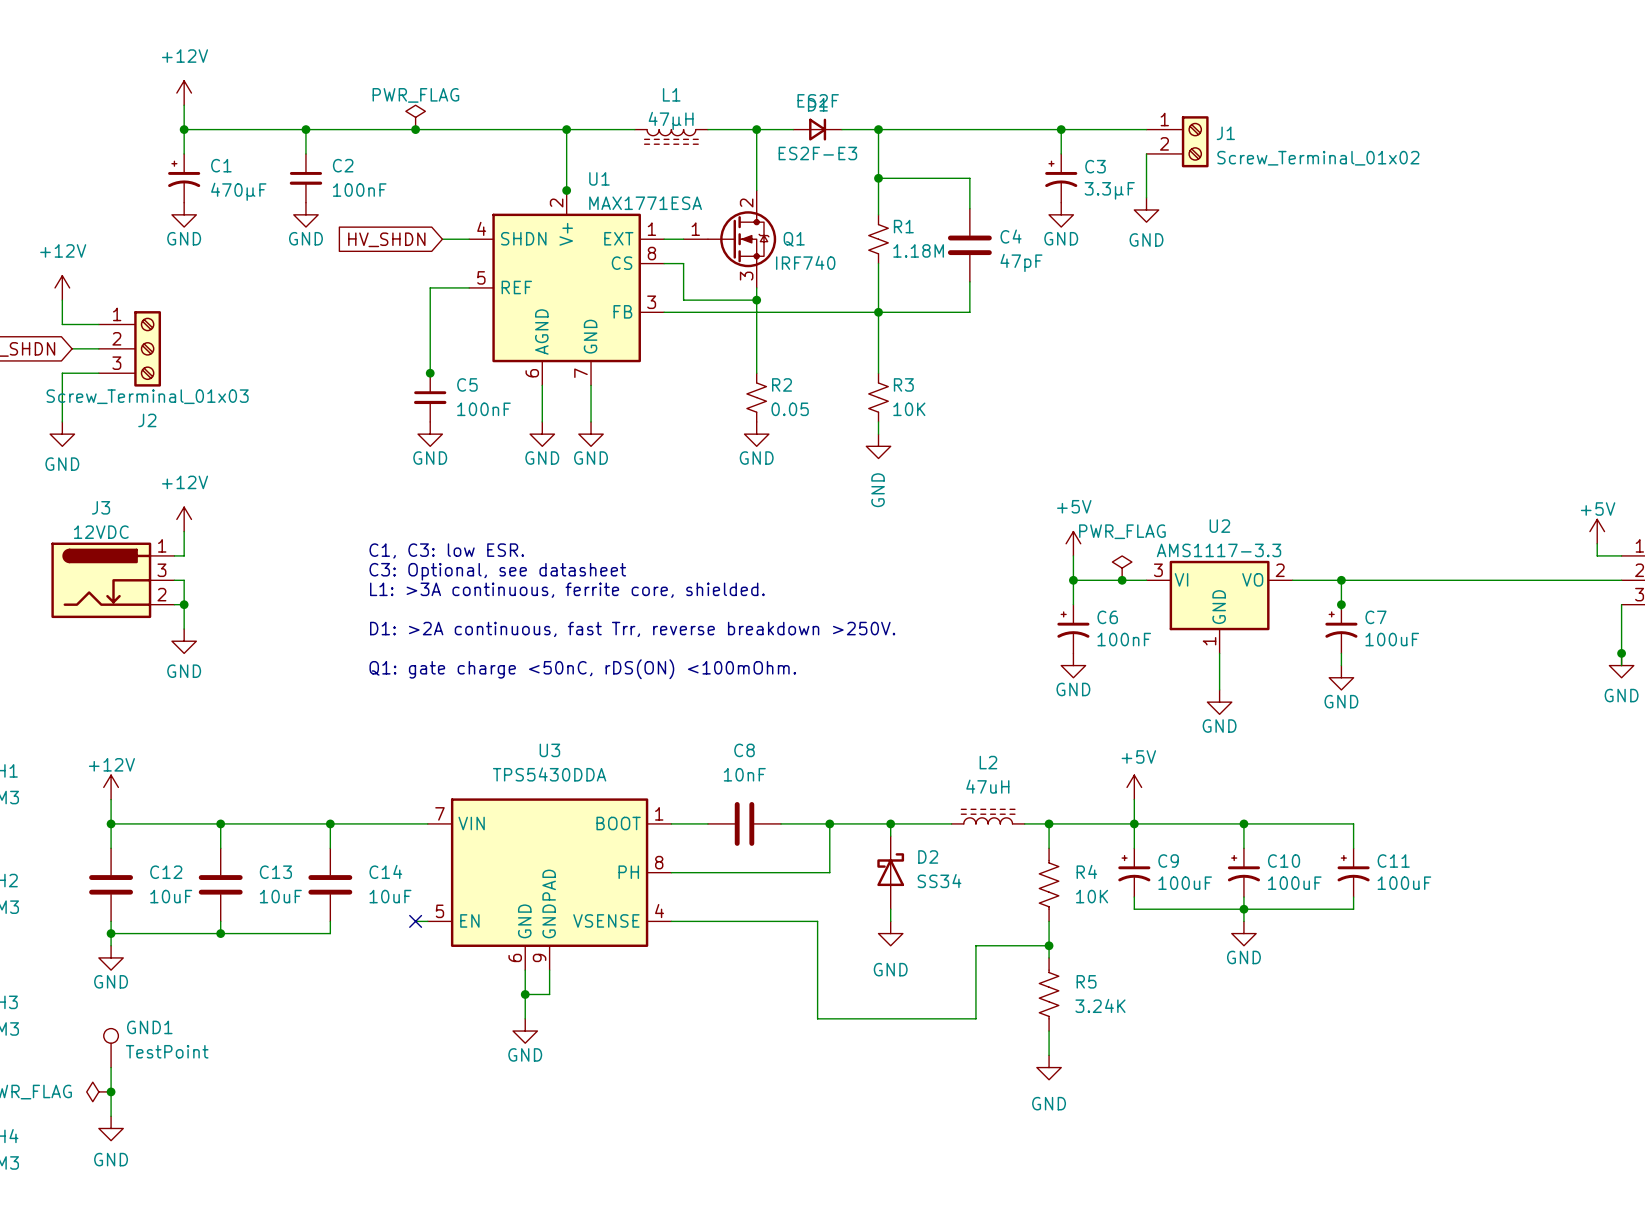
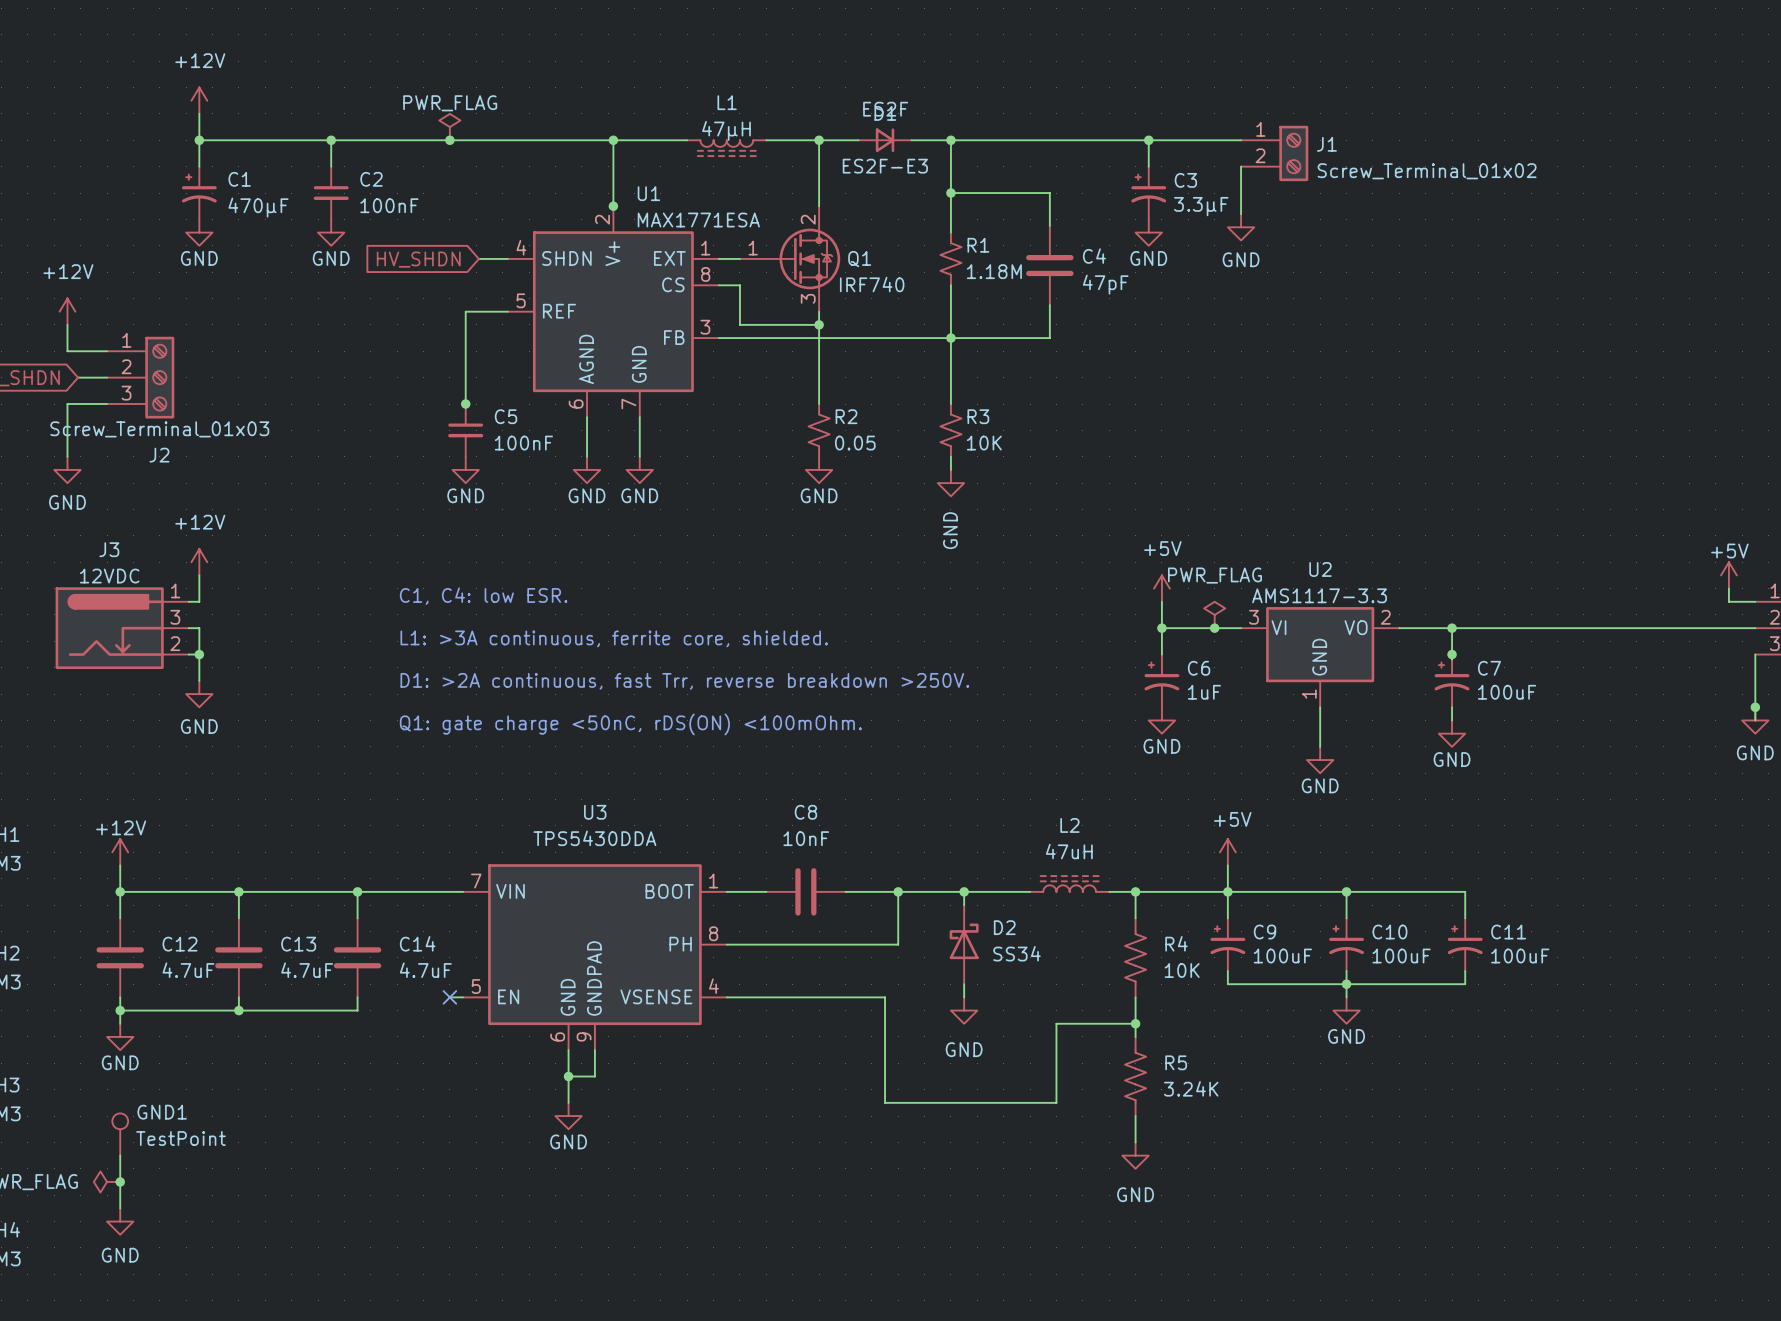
text: C1, C3: low ESR. (446, 550) -> C1, C4: low ESR. (483, 596)
text: C3: Optional, see datasheet (497, 571) -> none
C6 value: 100nF (1124, 639) -> 1uF (1204, 692)
C12 value: 10uF (171, 896) -> 4.7uF (188, 970)
C13 value: 10uF (280, 896) -> 4.7uF (307, 970)
C14 value: 10uF (390, 896) -> 4.7uF (425, 970)

